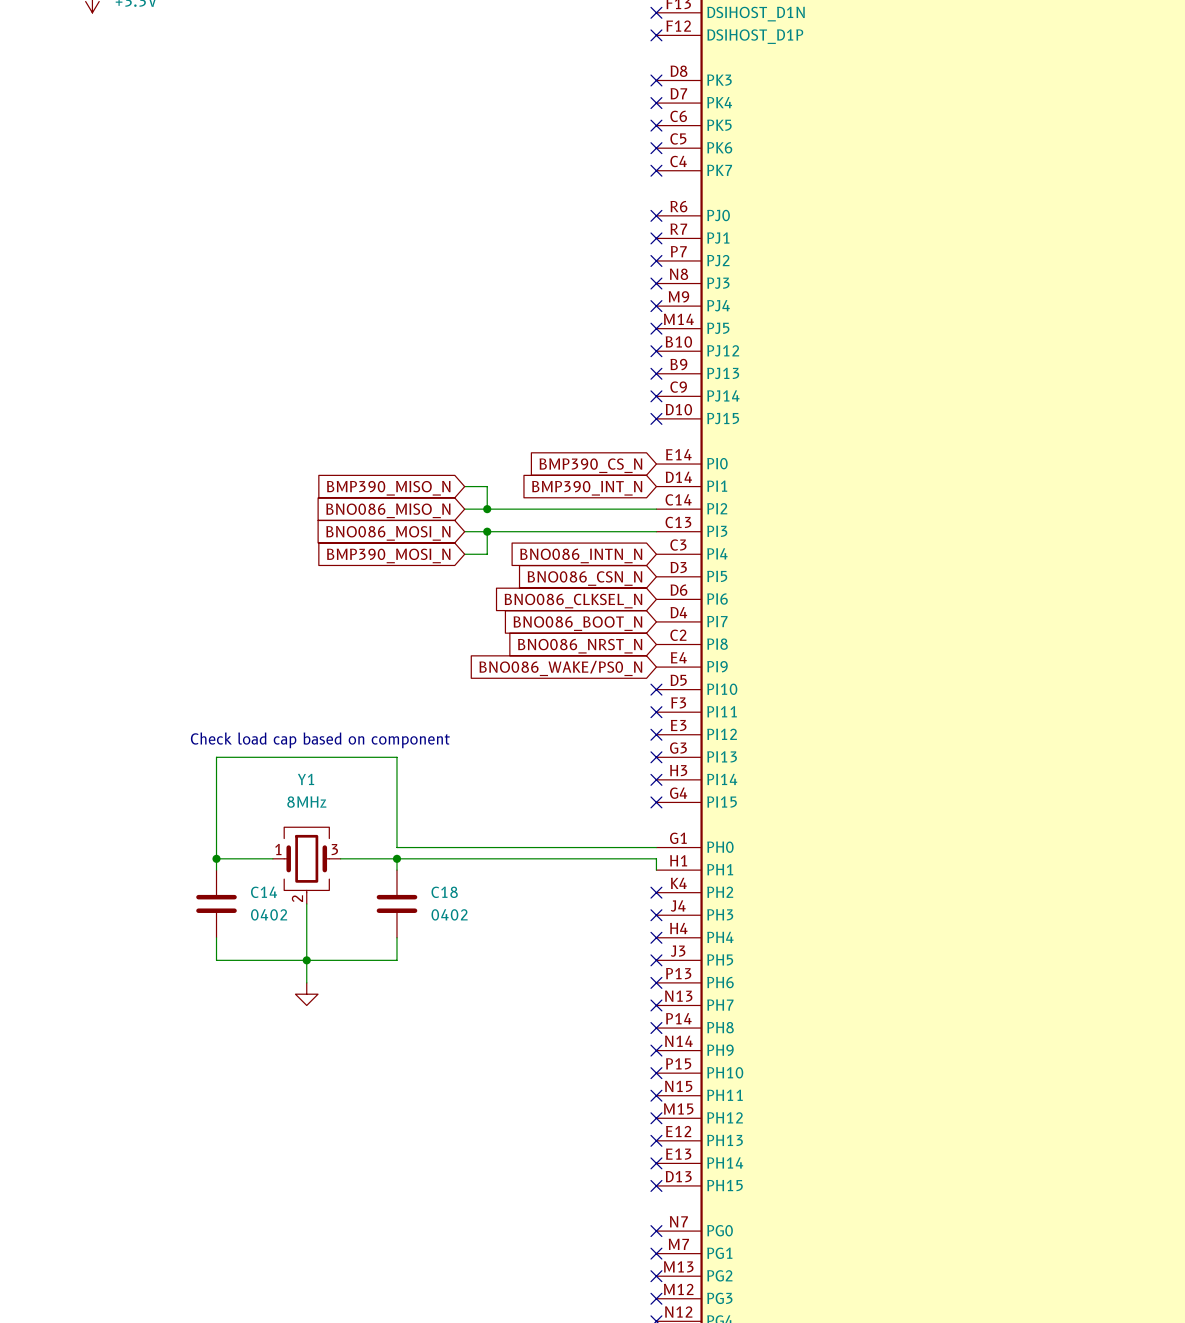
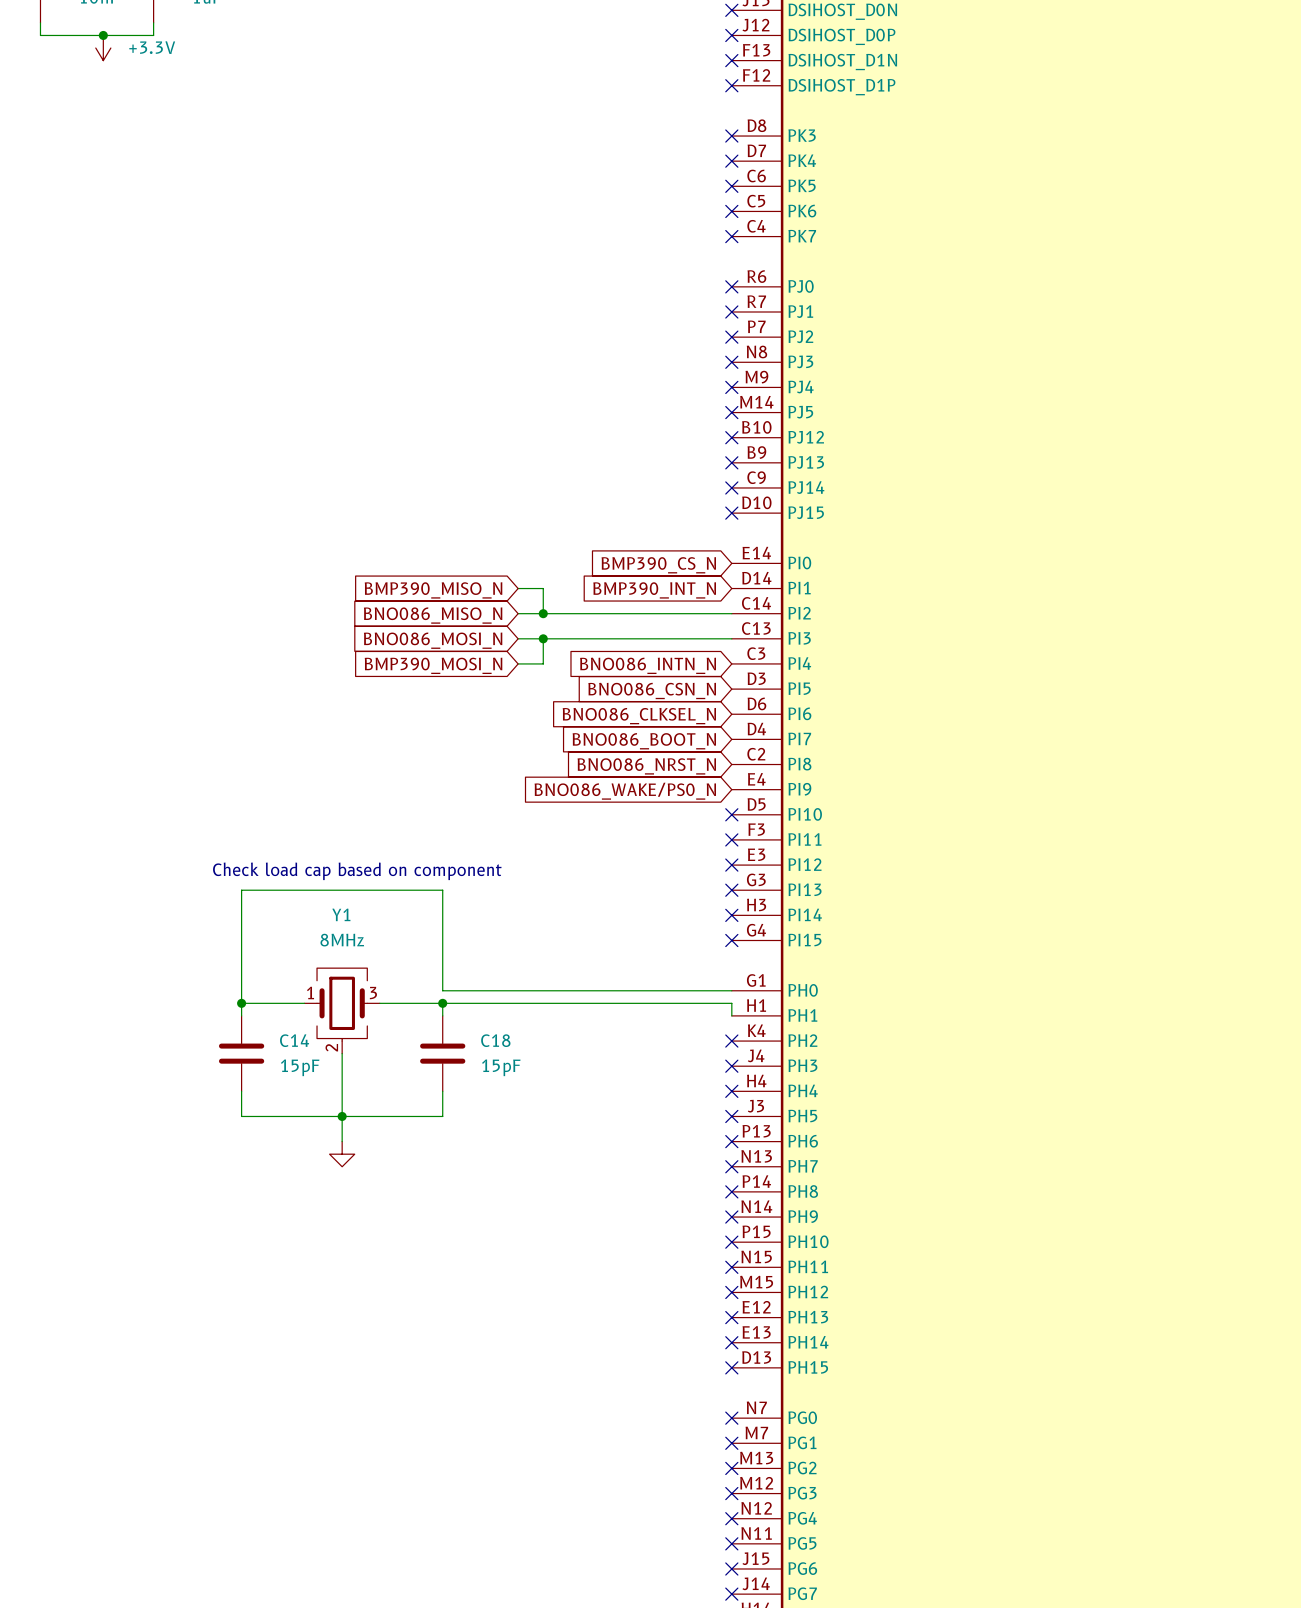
C14 value: 0402 (269, 914) -> 15pF (300, 1067)
C18 value: 0402 (449, 914) -> 15pF (501, 1067)

